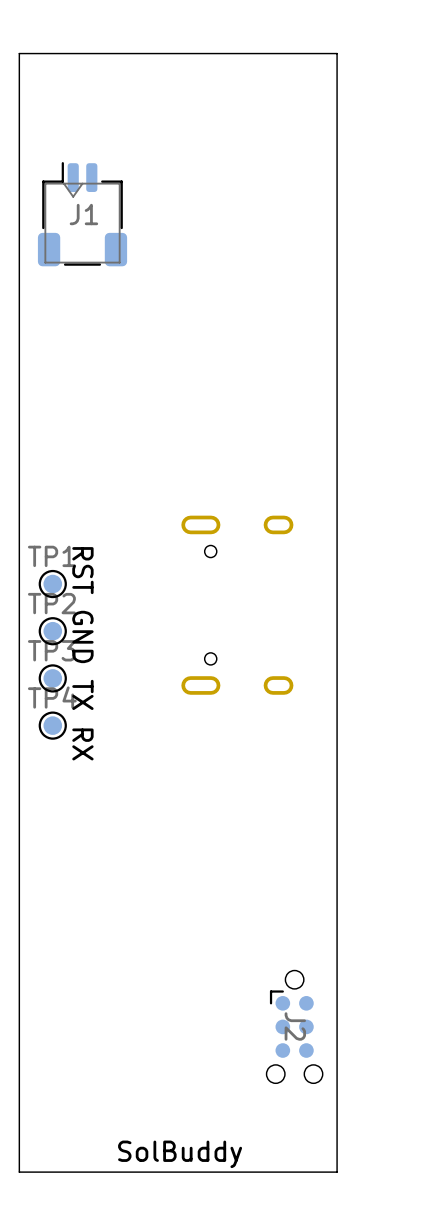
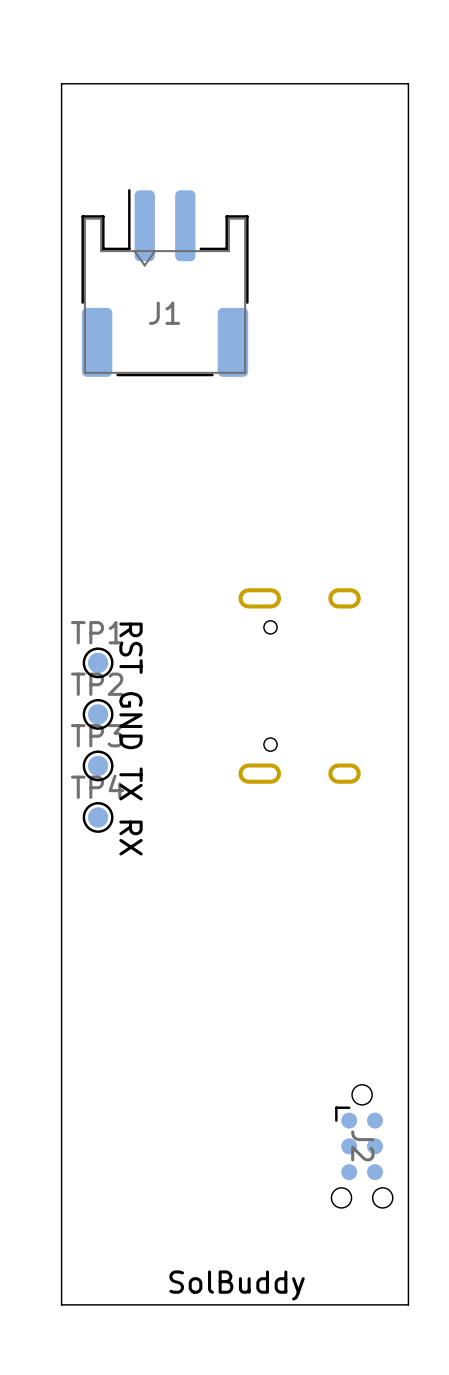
J1 footprint: [37, 162, 128, 267] -> [81, 189, 249, 377]

